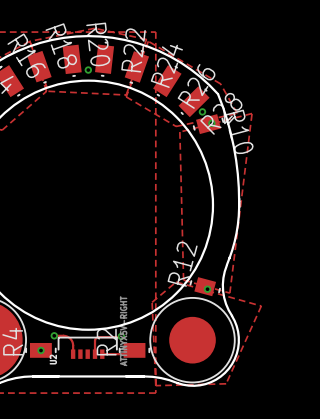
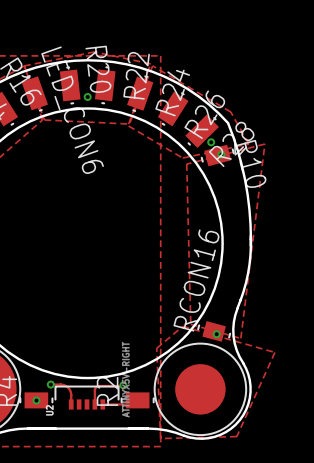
R18 name: R18 (61, 45) -> LED_CON6 (72, 110)
R12 name: R12 (182, 264) -> RCON16 (196, 280)

